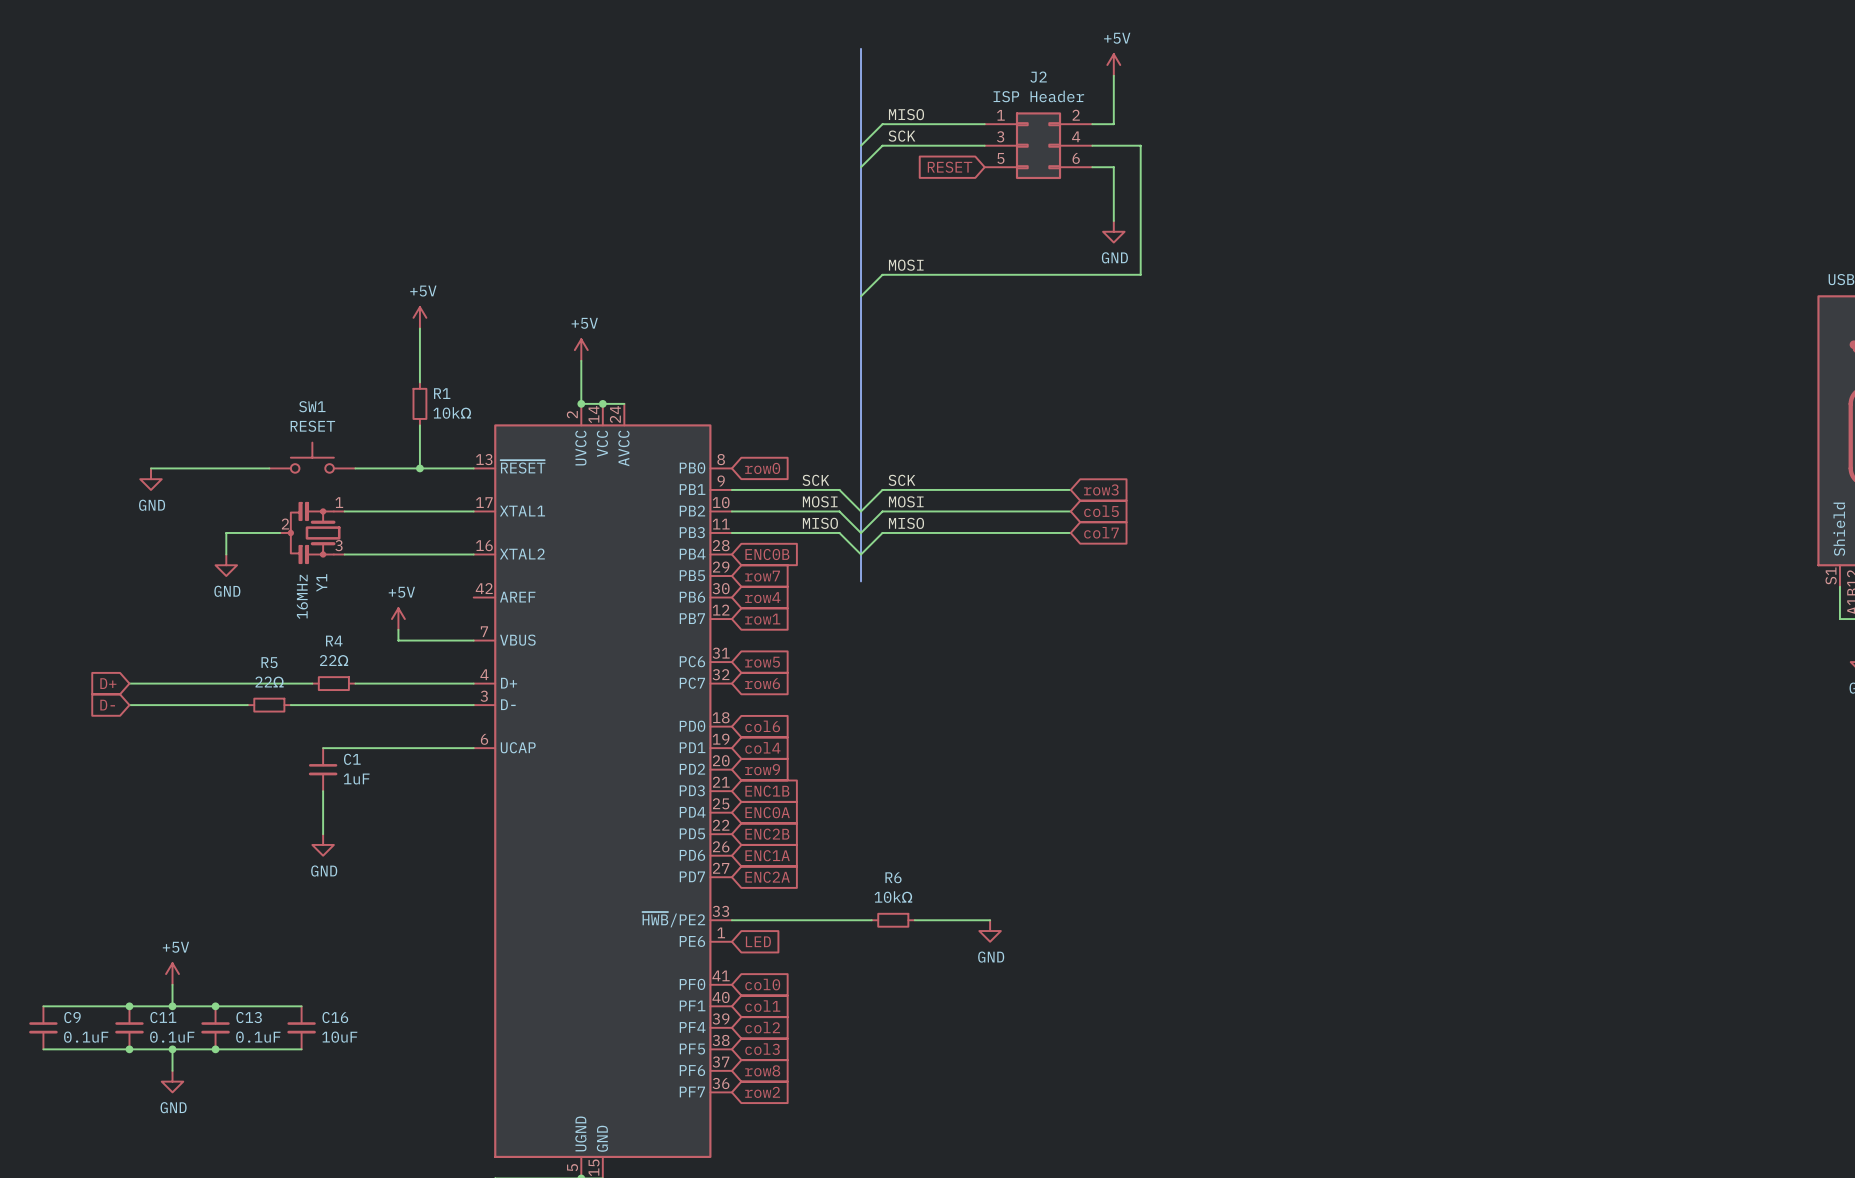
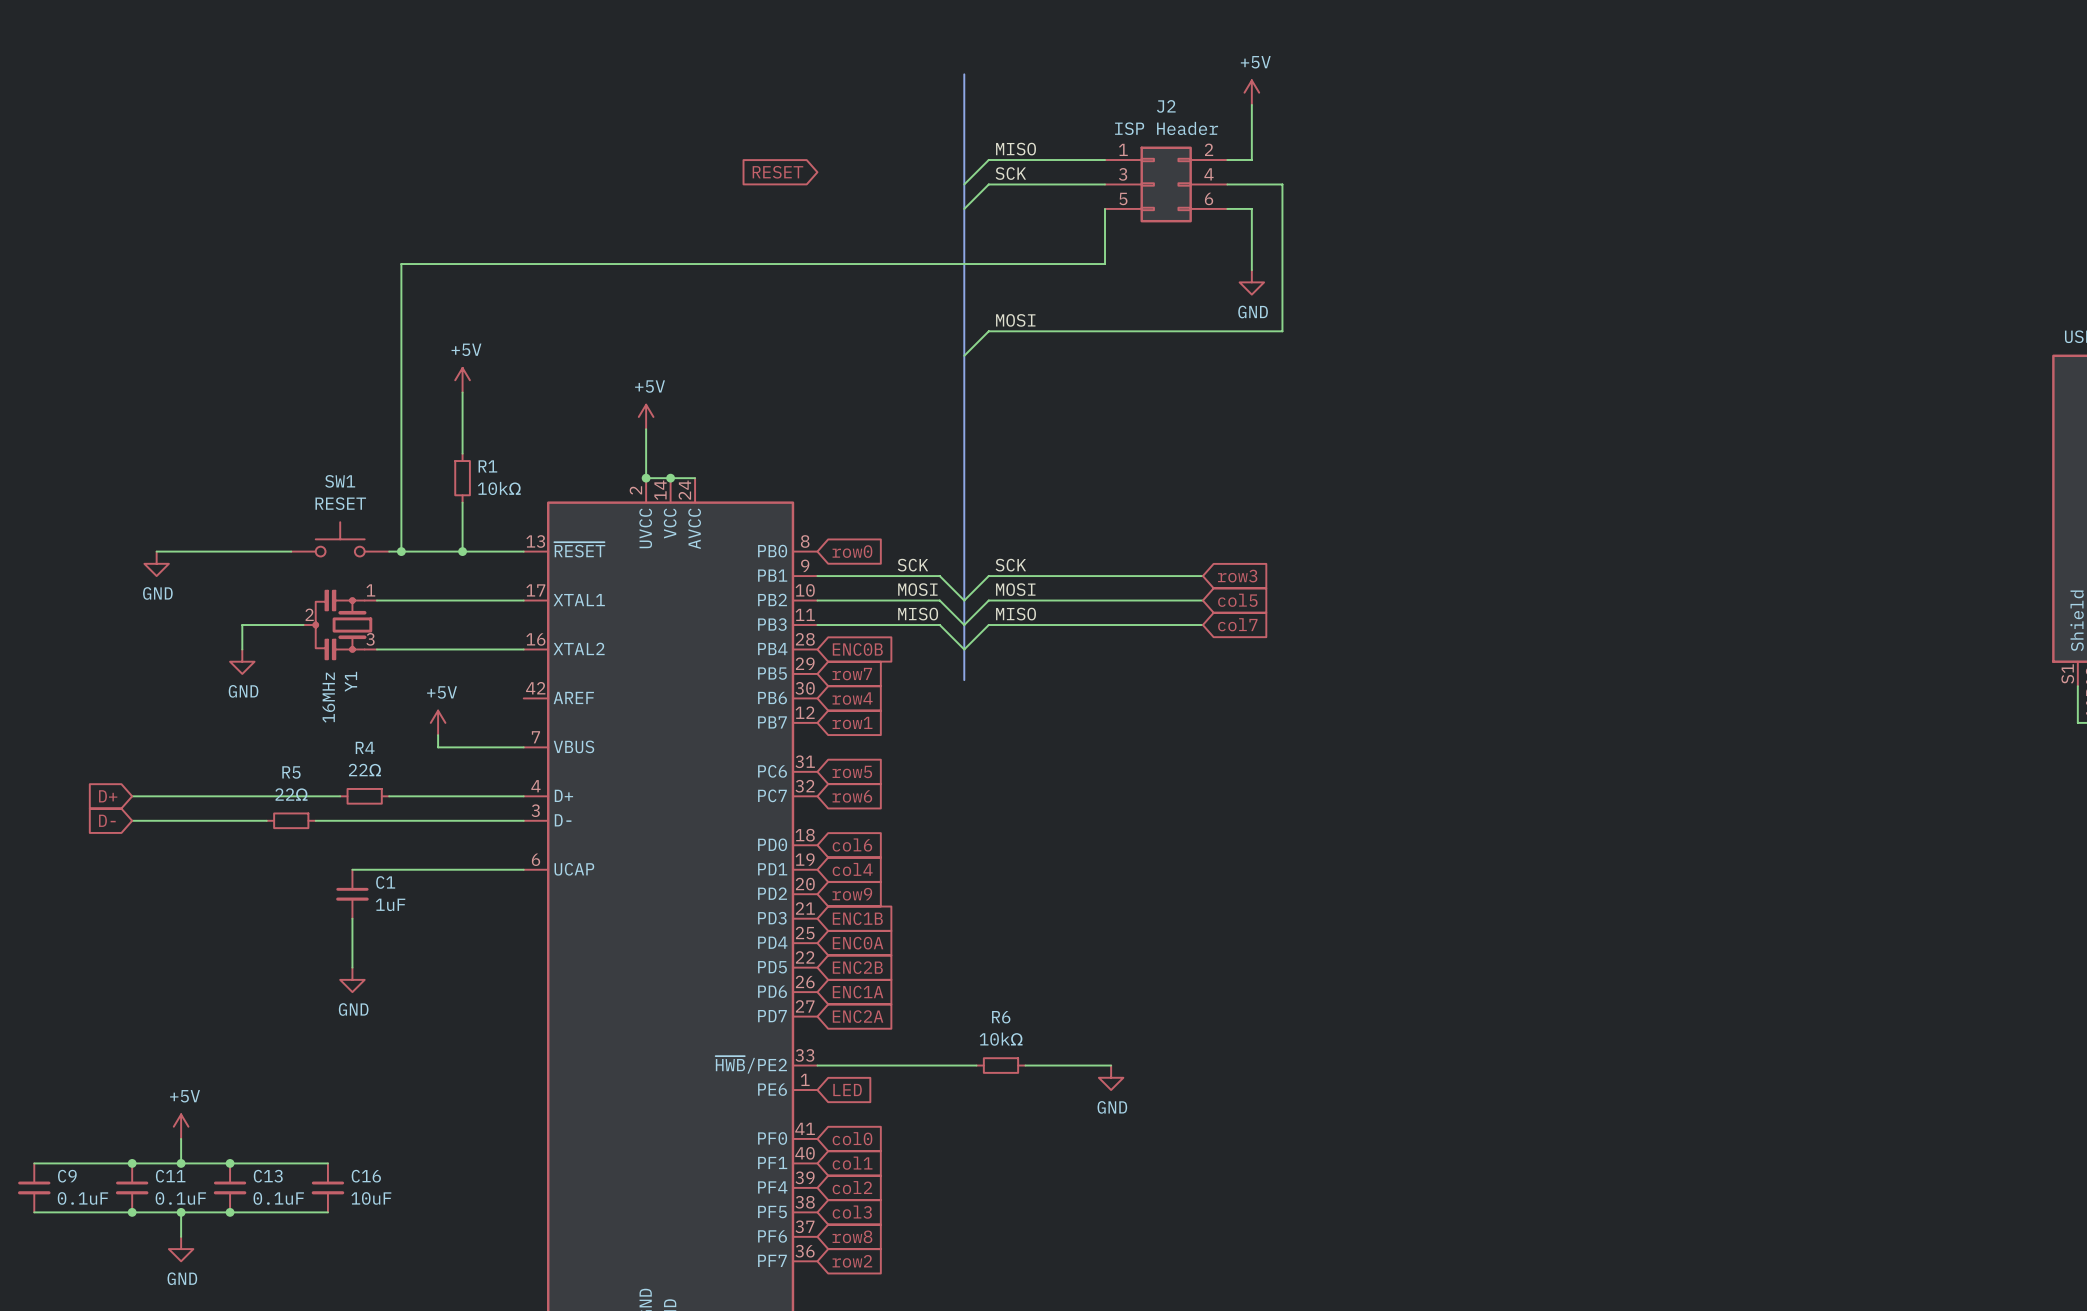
global label: none -> RESET (777, 172)
global label: RESET (950, 167) -> none
wire: none -> (1105, 208) (1105, 264) (401, 264) (401, 551)
junction: none -> (401, 551)

